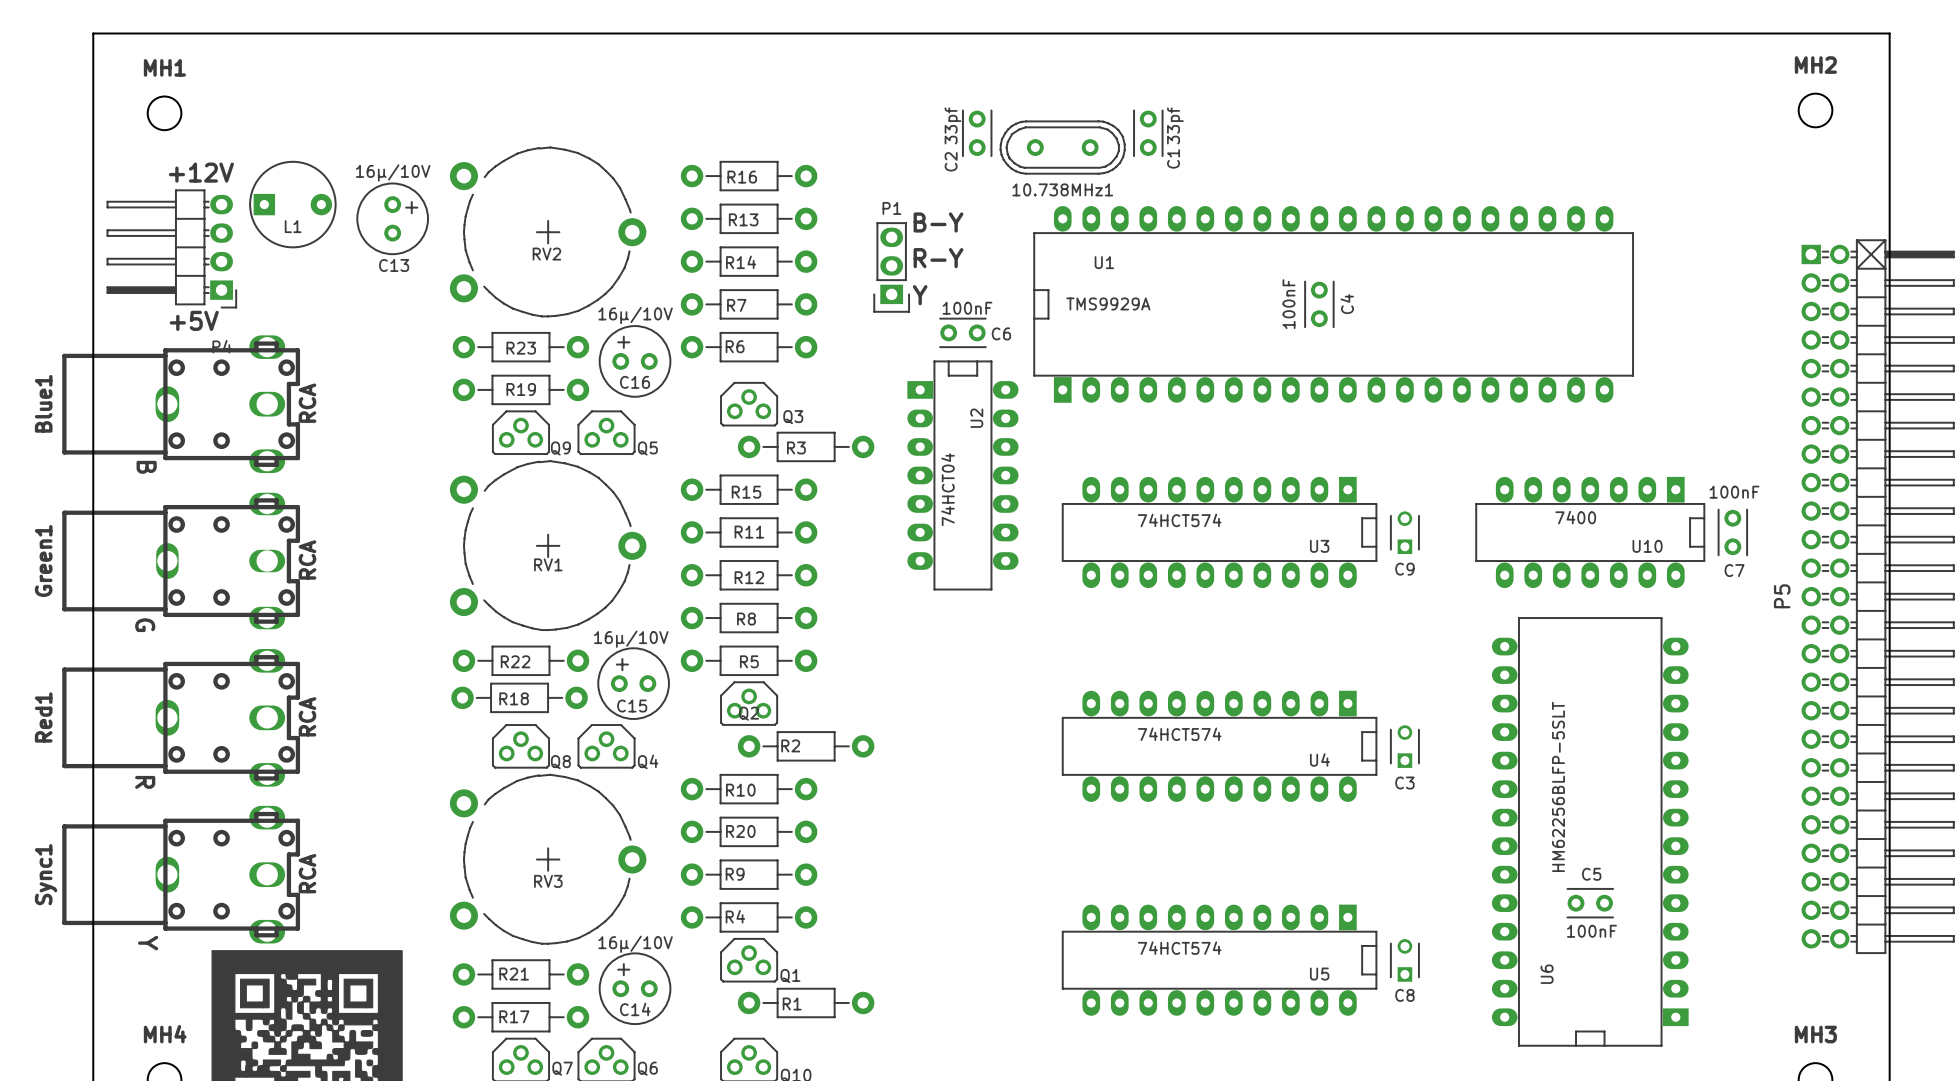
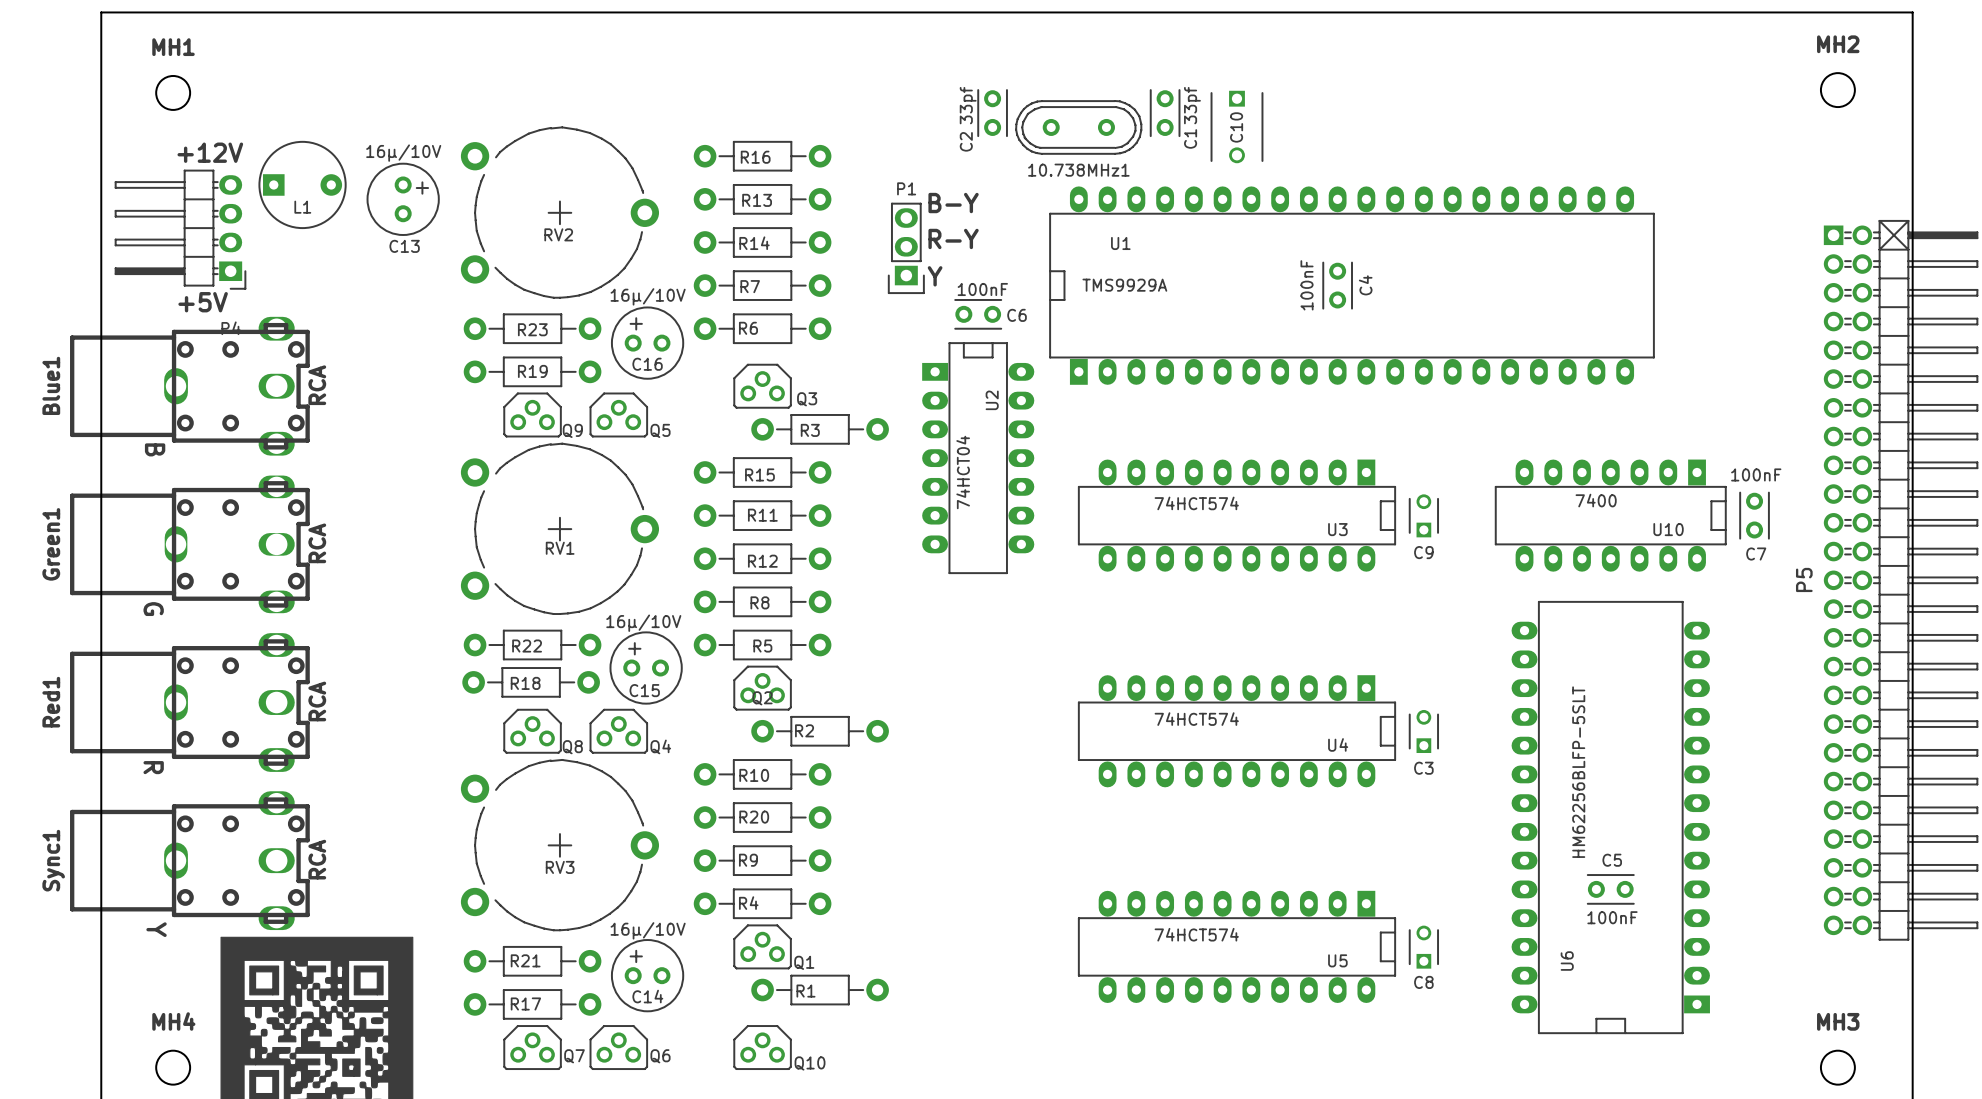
C10: none -> (1236, 127)

